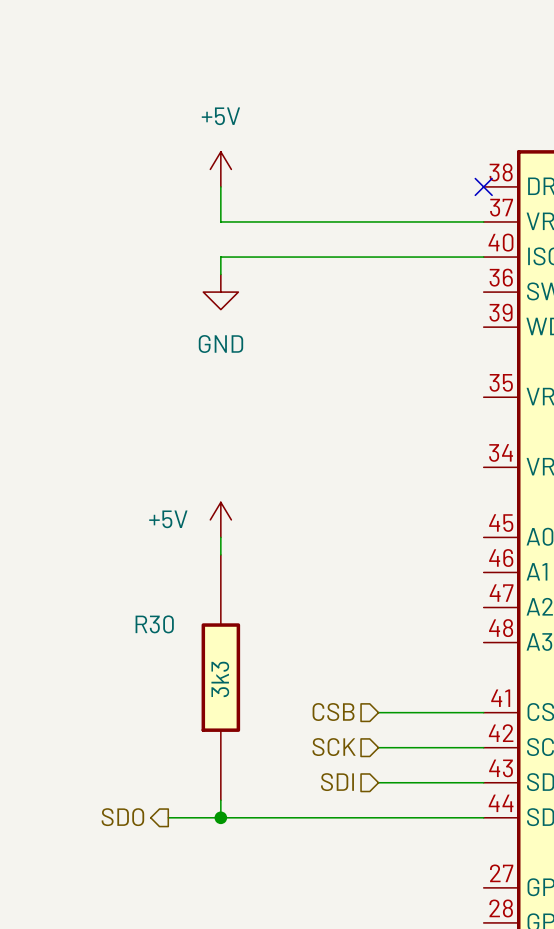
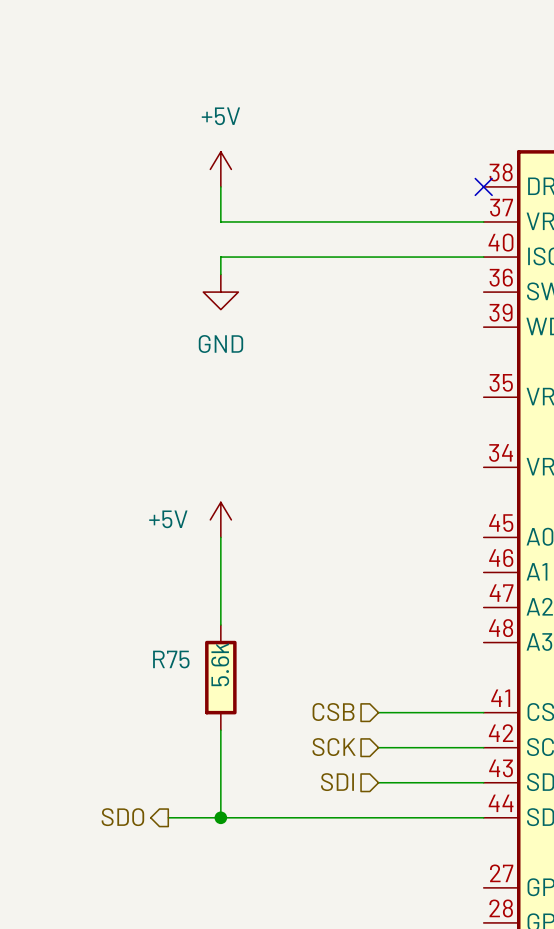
R30: 3k3 (220, 677) -> none
R75: none -> 5.6k (220, 677)

